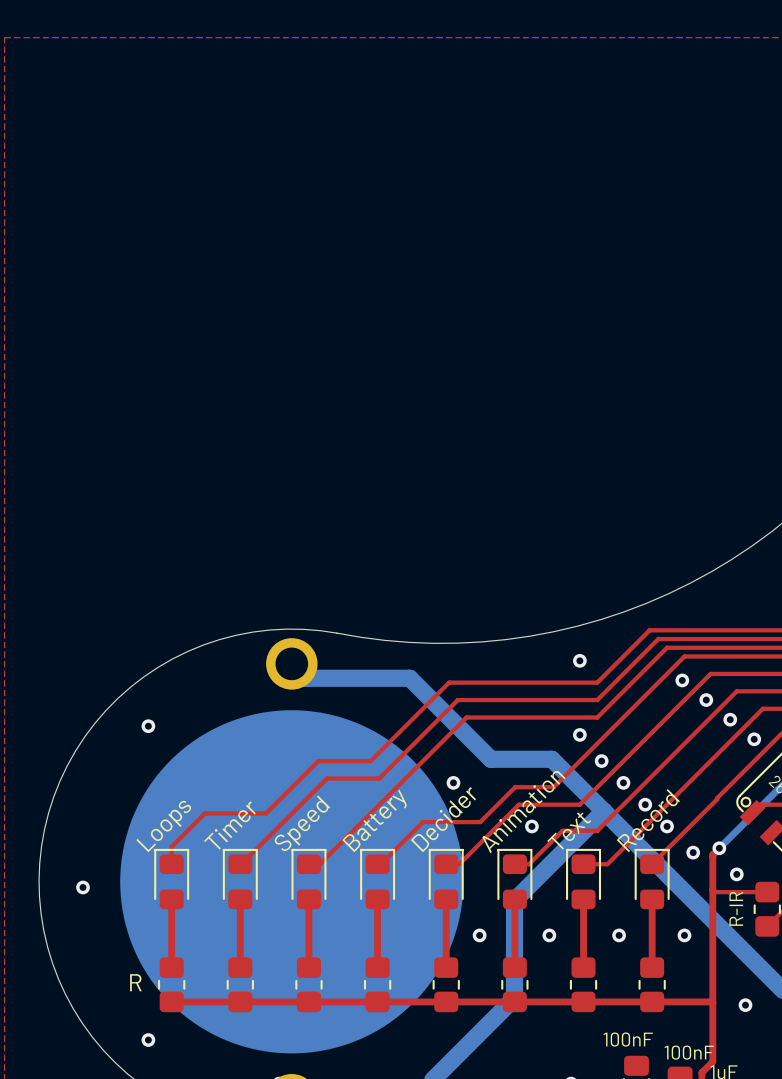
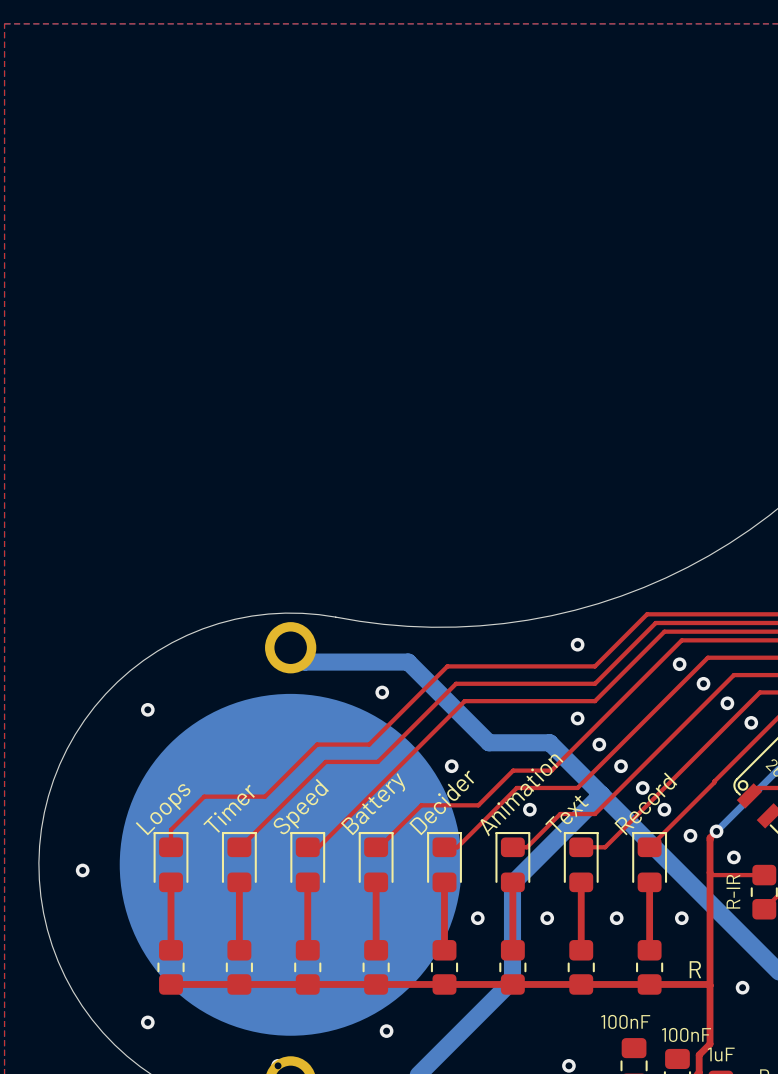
via: none -> (382, 692)
text: R (135, 982) -> none
text: none -> R (695, 969)
via: none -> (386, 1031)

